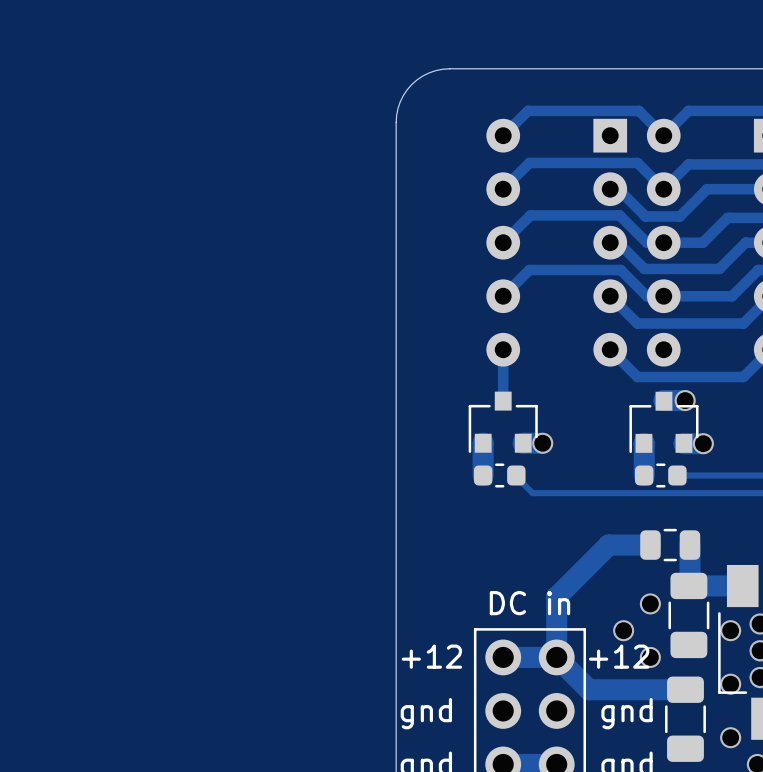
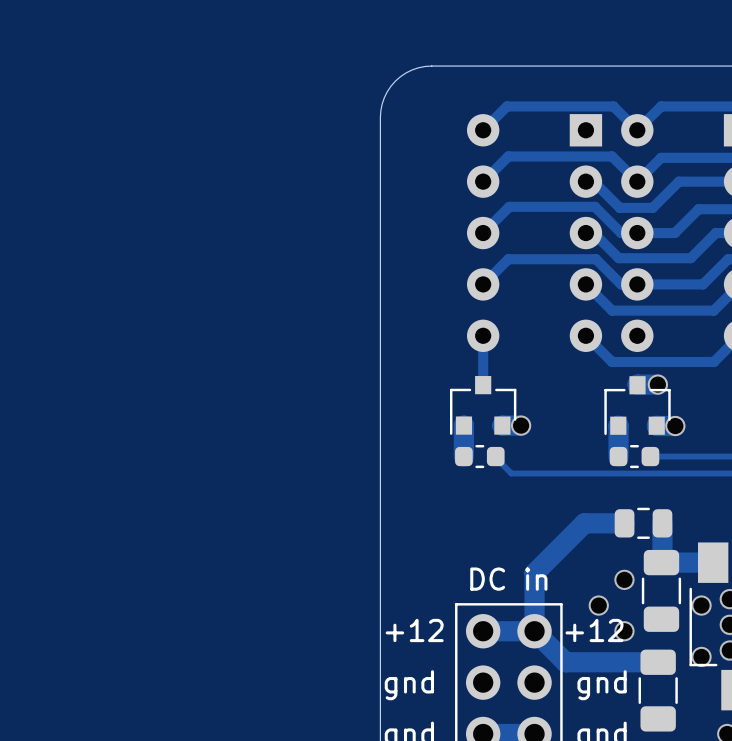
via: (730, 737) -> none

